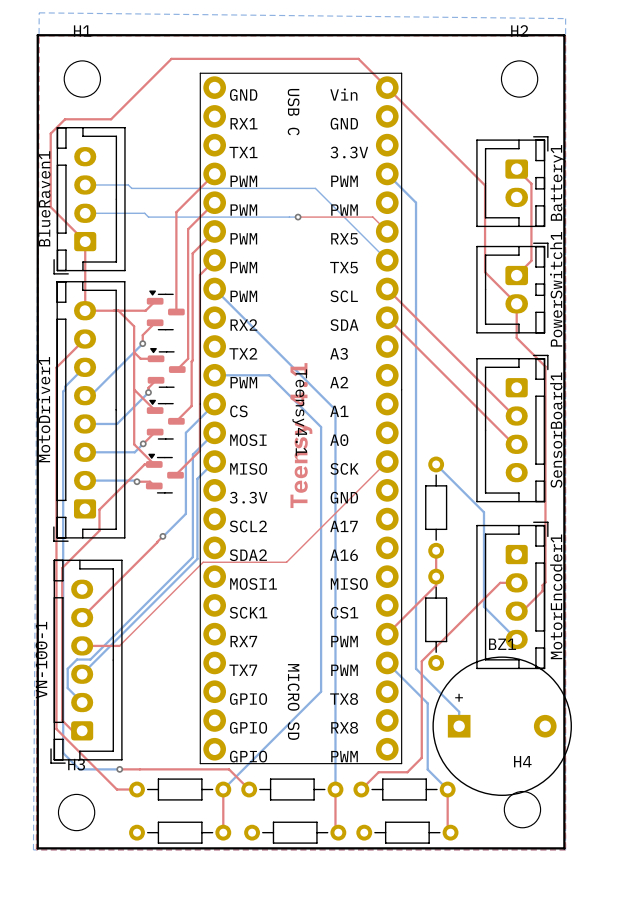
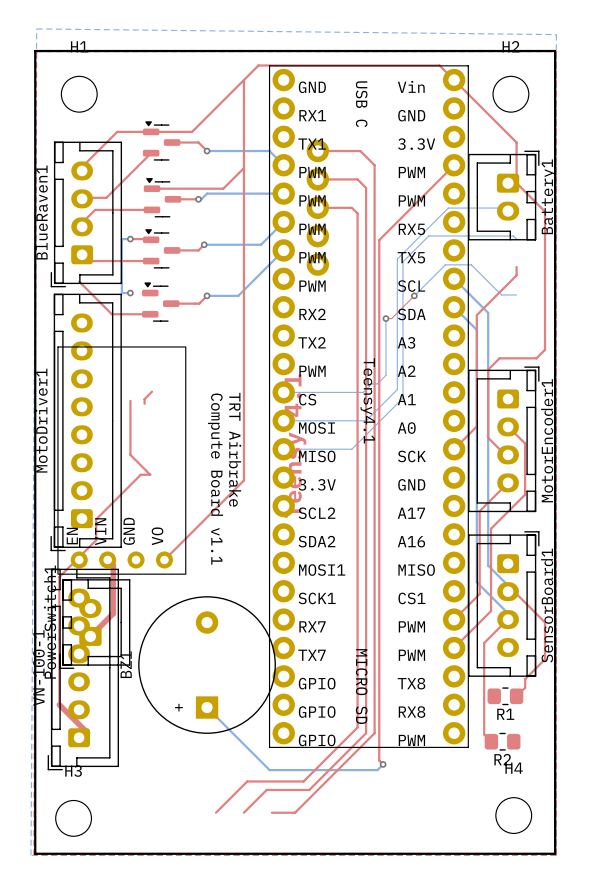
top track: none -> (243, 80) (243, 480) (164, 559)
Teensy4.1 footprint: [199, 72, 403, 765] -> [268, 65, 469, 748]
part: none -> (161, 140)
top track: none -> (172, 142) (198, 142) (207, 151)
bottom track: none -> (207, 151) (269, 151) (283, 165)
via: none -> (207, 151)
top track: none -> (317, 151) (360, 151) (374, 165) (374, 733) (295, 812) (271, 812)
top track: none -> (151, 153) (106, 197) (79, 197)
top track: none -> (454, 165) (379, 240) (379, 760) (383, 764)
top track: none -> (243, 168) (223, 188) (152, 188)
top track: none -> (317, 179) (357, 179) (366, 187) (366, 733) (309, 789) (266, 789) (243, 812)
top track: (516, 169) (531, 183) (531, 260) (516, 275) -> none
top track: (214, 173) (176, 212) (176, 312) -> none
bottom track: (387, 173) (416, 202) (416, 668) (459, 711) (459, 726) -> none
bottom track: none -> (283, 193) (207, 193) (201, 199) (198, 199)
part: none -> (162, 197)
bottom track: (85, 184) (128, 184) (131, 188) (315, 188) (387, 260) -> none
top track: none -> (172, 199) (198, 199)
via: none -> (198, 199)
top track: none -> (317, 207) (351, 207) (357, 213) (357, 727) (303, 781) (247, 781) (216, 812)
top track: none -> (152, 209) (95, 209) (79, 225)
bottom track: none -> (516, 211) (513, 208) (448, 208) (397, 259) (397, 389) (366, 420) (283, 420)
top track: (214, 202) (188, 229) (188, 358) (177, 369) -> none
bottom track: none -> (283, 222) (261, 244) (204, 244)
bottom track: (85, 213) (144, 213) (148, 217) (298, 217) -> none
top track: (298, 217) (372, 217) (387, 231) -> none
via: (298, 217) -> none
top track: none -> (130, 239) (151, 239)
bottom track: none -> (130, 239) (121, 239) (121, 293) (130, 293)
via: none -> (130, 239)
bottom track: none -> (516, 239) (513, 236) (428, 236) (403, 261) (403, 398) (351, 449) (283, 449)
top track: none -> (204, 244) (198, 250) (172, 250)
via: none -> (204, 244)
top track: (214, 231) (192, 253) (191, 406) (176, 421) -> none
part: none -> (161, 248)
bottom track: none -> (283, 250) (238, 295) (207, 295)
top track: none -> (79, 253) (86, 261) (151, 261)
top track: none -> (516, 267) (516, 275) (476, 315) (476, 426) (454, 449)
top track: (214, 260) (199, 274) (199, 450) (175, 475) -> none
bottom track: none -> (454, 278) (488, 312) (488, 565) (510, 588)
top track: none -> (79, 281) (111, 314) (150, 314)
via: none -> (130, 293)
bottom track: none -> (516, 294) (501, 294) (471, 264) (445, 264) (414, 295)
top track: none -> (207, 295) (199, 303) (171, 303)
via: none -> (207, 295)
top track: none -> (414, 295) (391, 318) (385, 318)
via: none -> (414, 295)
bottom track: (214, 288) (335, 409) (335, 789) -> none
top track: (387, 288) (514, 416) (516, 416) -> (454, 648) (491, 611) (491, 528) (525, 494) (525, 443) (508, 426)
PowerSwitch1 rotation: 0° (512, 288) -> 180° (94, 624)
PowerSwitch1 position: (512, 288) -> (94, 624)
bottom track: none -> (454, 307) (476, 329) (476, 582) (510, 616)
top track: (155, 301) (145, 310) (85, 310) (85, 241) (50, 207) (50, 133) (65, 119) (111, 119) (171, 58) (358, 58) (485, 185) (485, 272) (516, 303) (516, 337) (545, 366) (545, 582) (542, 585) (542, 591) (522, 611) (516, 611) -> none
bottom track: none -> (385, 318) (385, 375) (377, 383) (371, 383) (363, 392) (283, 392)
via: none -> (385, 318)
top track: (118, 310) (134, 326) (134, 389) (155, 410) -> none
part position: (165, 310) -> (160, 302)
top track: (387, 317) (496, 427) -> (79, 169) (117, 131) (192, 131) (258, 65) (439, 65) (516, 142) (516, 183) (544, 211) (544, 349) (536, 358) (499, 358) (488, 369) (488, 437)
top track: (155, 322) (142, 335) (142, 343) -> none
top track: (85, 339) (56, 367) (56, 729) (116, 789) (137, 789) -> none
bottom track: (142, 343) (90, 395) (85, 395) -> none
via: (142, 343) -> none
top track: (134, 352) (140, 358) (156, 358) -> none
bottom track: (85, 367) (65, 386) (63, 391) (63, 753) (79, 769) (119, 769) -> none
part: (166, 367) -> none
bottom track: (214, 375) (269, 375) (321, 427) (321, 691) (223, 789) -> none
bottom track: (148, 392) (117, 423) (85, 423) -> none
via: (148, 392) -> none
bottom track: (214, 404) (185, 432) (185, 513) (162, 536) -> none
part: (165, 419) -> none
SensorBoard1 name: SensorBoard1 (556, 430) -> MotorEncoder1 (547, 440)
top track: (155, 432) (143, 443) -> none
bottom track: (214, 432) (192, 454) (192, 557) (90, 659) (77, 659) (67, 668) (67, 688) (82, 702) -> none
text: none -> TRT Airbrake (235, 449)
bottom track: (143, 443) (134, 452) (85, 452) -> none
via: (143, 443) -> none
part: none -> (121, 460)
bottom track: (214, 461) (197, 478) (197, 558) (82, 674) -> none
top track: (387, 461) (286, 562) (203, 562) (119, 645) (82, 645) -> none
bottom track: (436, 464) (484, 512) (484, 606) (516, 639) -> none
text: none -> Compute Board v1.1 (215, 479)
top track: none -> (508, 482) (479, 511) (479, 594) (454, 619)
part: (164, 473) -> none
bottom track: (85, 480) (137, 481) -> none
top track: (137, 481) (150, 481) (154, 485) -> none
via: (137, 481) -> none
part: (436, 507) -> none
top track: (162, 536) (82, 617) -> none
via: (162, 536) -> none
top track: none -> (107, 559) (113, 565) (113, 613) (90, 636)
top track: (436, 550) (436, 585) (387, 634) -> none
top track: none -> (510, 588) (544, 622) (544, 659) (525, 679) (525, 687) (516, 696)
top track: (516, 582) (500, 582) (421, 661) (421, 757) (407, 772) (378, 772) (361, 789) -> none
MotorEncoder1 name: MotorEncoder1 (556, 596) -> SensorBoard1 (547, 605)
top track: none -> (510, 616) (484, 643) (484, 734) (491, 741)
part: (436, 619) -> none
bottom track: (387, 662) (427, 703) (427, 769) (447, 789) -> none
R1: none -> (505, 696)
top track: (62, 697) (62, 720) (72, 730) (82, 730) -> (59, 704) (87, 732)
bottom track: none -> (207, 707) (269, 770) (377, 770) (383, 764)
BZ1 rotation: 0° (502, 726) -> 90° counterclockwise (207, 665)
BZ1 position: (502, 726) -> (207, 665)
R2: none -> (502, 741)
via: none -> (383, 764)
top track: (119, 769) (229, 769) (249, 789) -> none
via: (119, 769) -> none
part: (180, 789) -> none
top track: (223, 789) (223, 832) -> none
part: (292, 789) -> none
top track: (335, 789) (335, 829) (338, 832) -> none
part: (404, 789) -> none
top track: (447, 789) (447, 829) (450, 832) -> none
part: (180, 832) -> none
part: (295, 832) -> none
part: (407, 832) -> none

